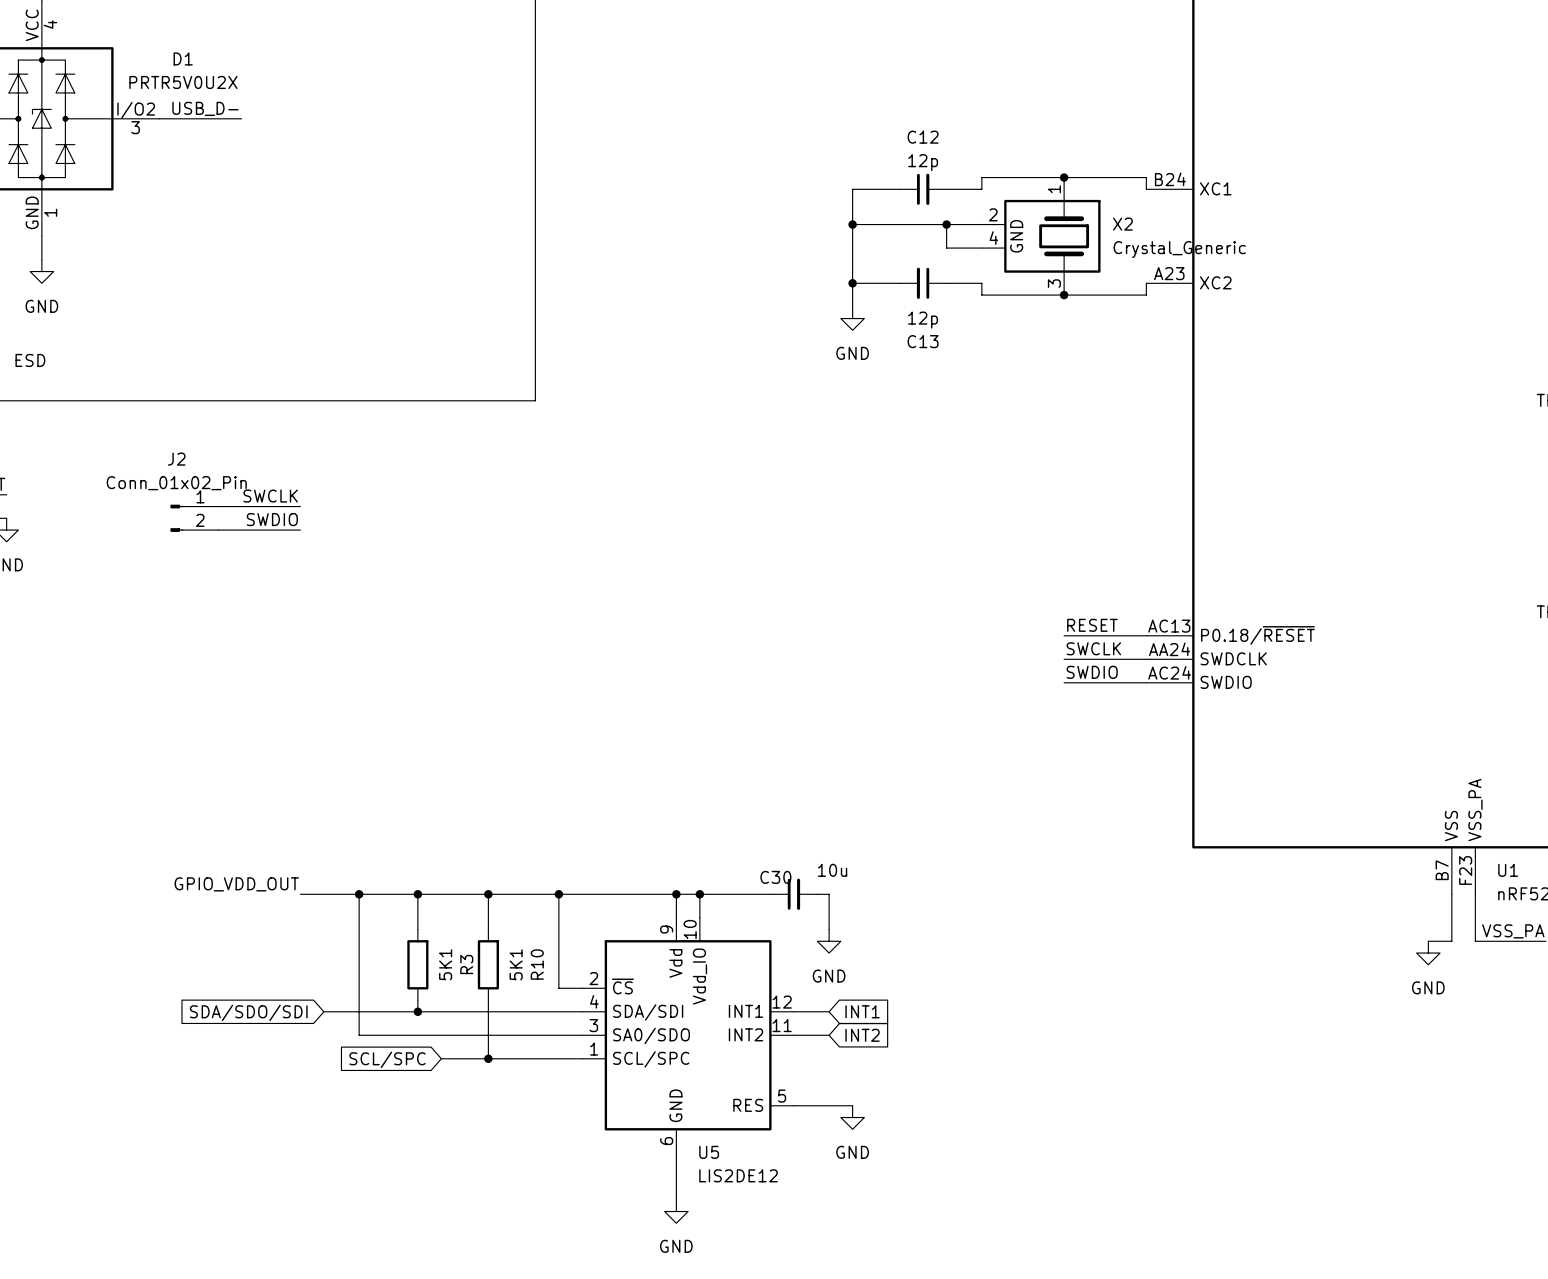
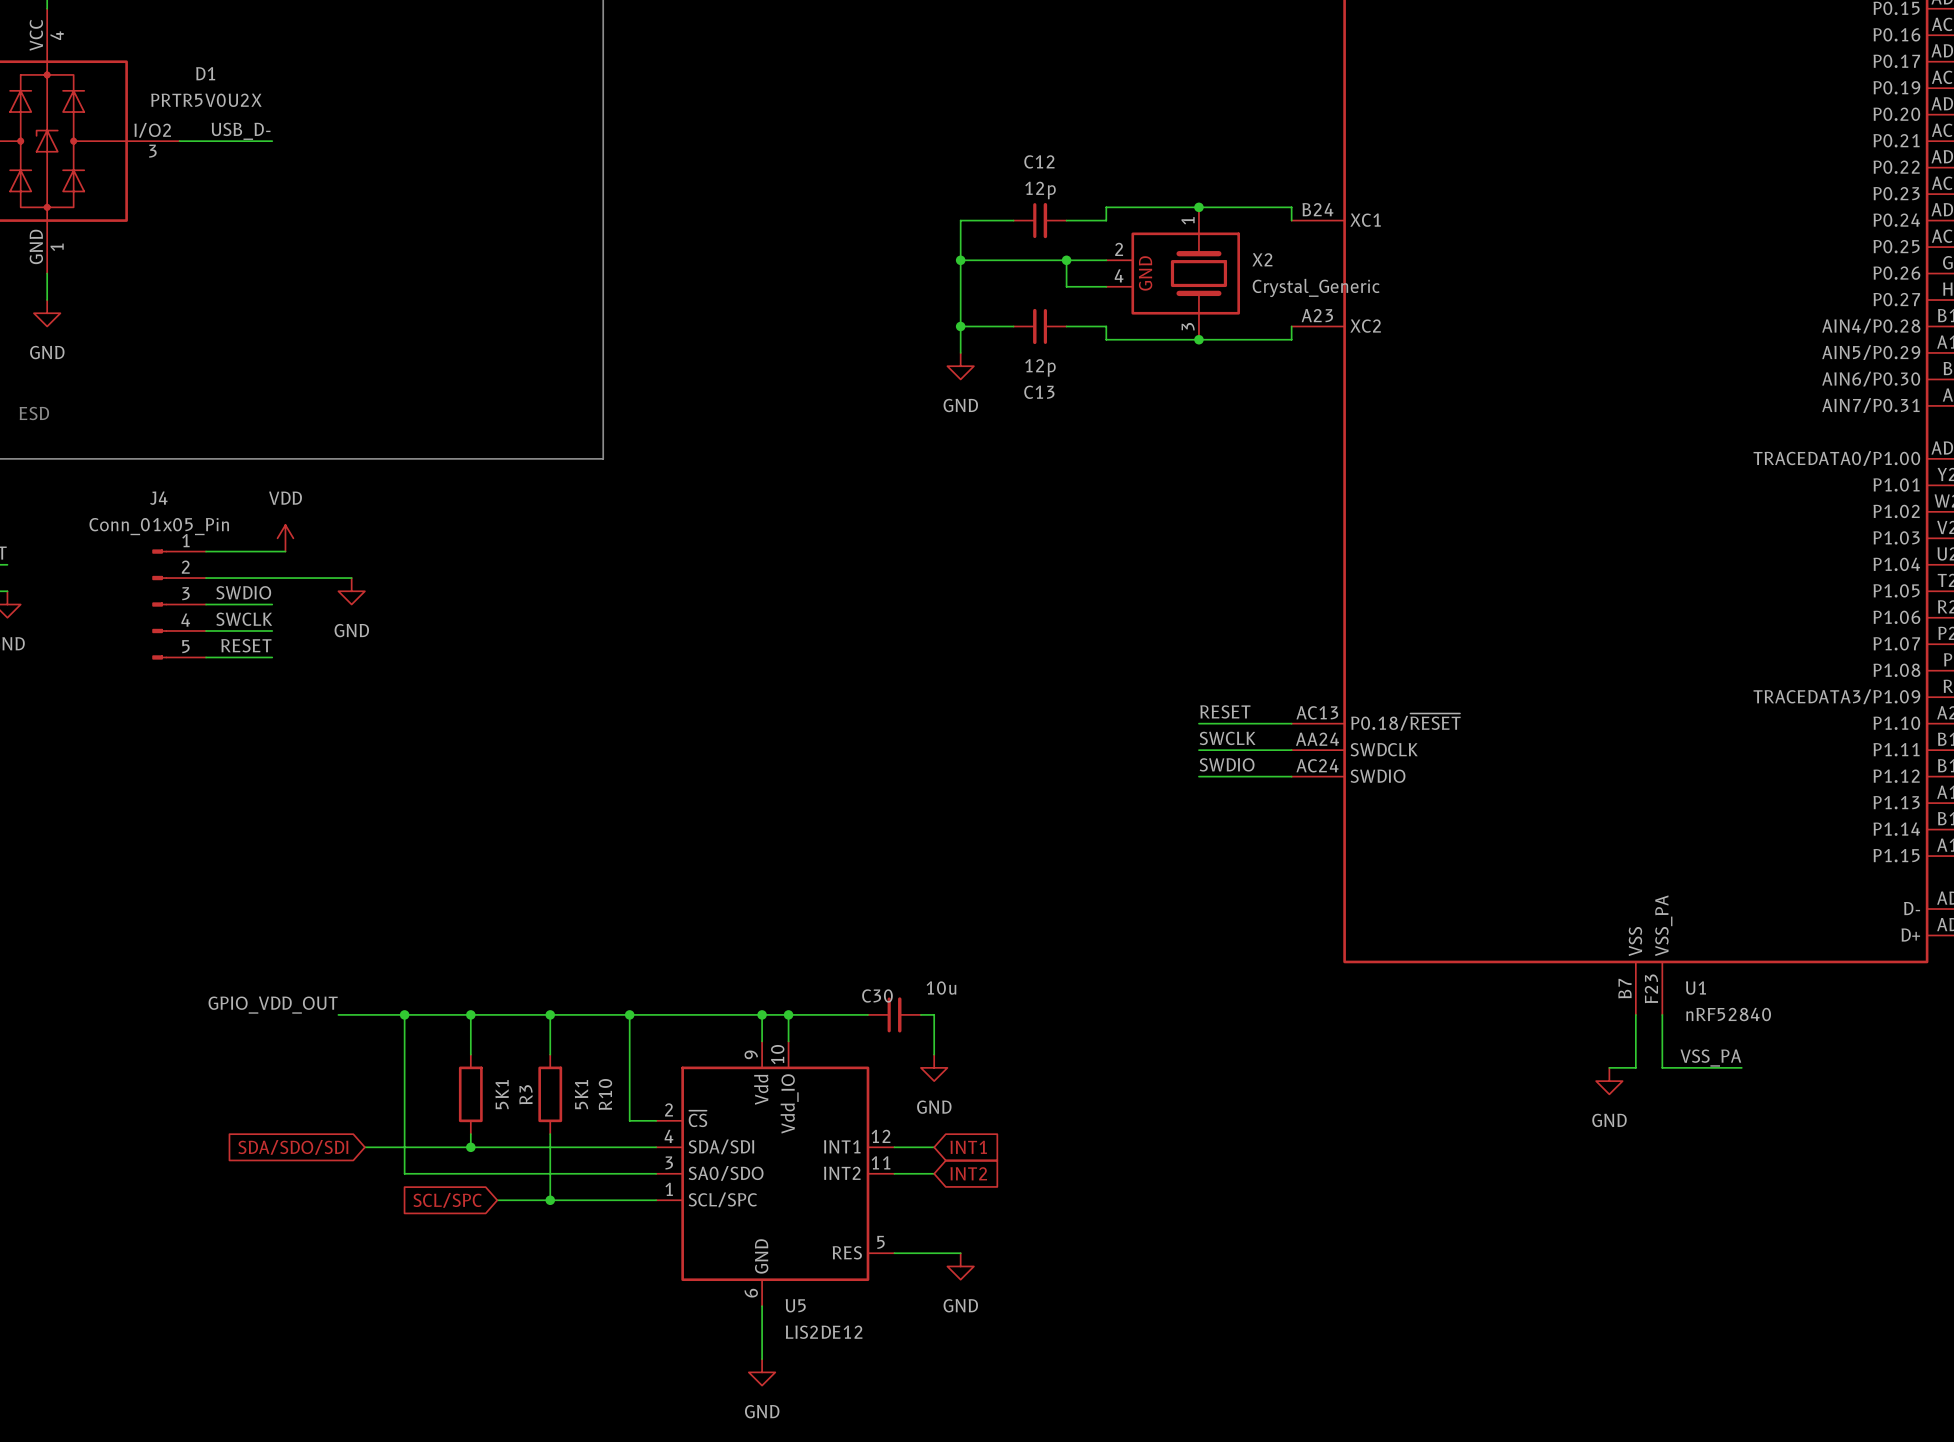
power symbol: none -> VDD (285, 538)
wire: none -> (206, 551) (285, 551)
label position: SWCLK (270, 496) -> SWCLK (244, 619)
wire: none -> (338, 578) (351, 578)
J2: Conn_01x02_Pin (194, 518) -> none
power symbol: none -> GND (351, 591)
label position: SWDIO (272, 519) -> SWDIO (243, 592)
J4: none -> Conn_01x05_Pin (179, 604)
wire: (241, 530) (300, 530) -> (206, 630) (272, 630)
label: none -> RESET (246, 645)
wire: none -> (206, 657) (272, 657)

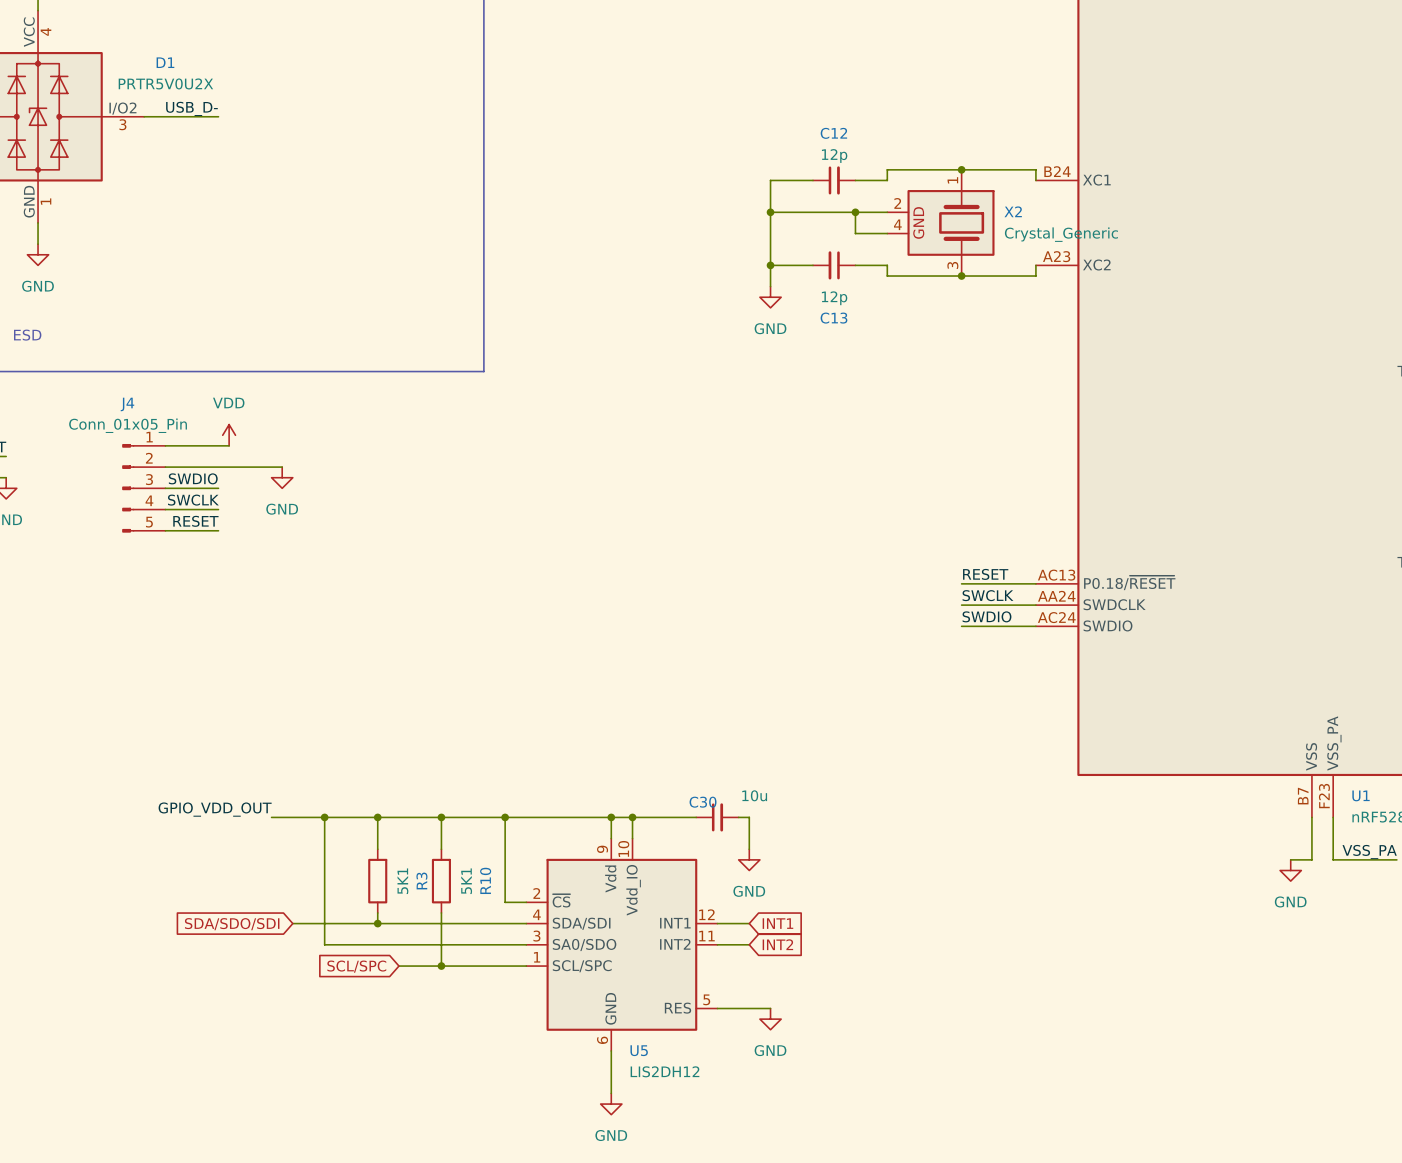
U5 value: LIS2DE12 (824, 1332) -> LIS2DH12 (664, 1071)

